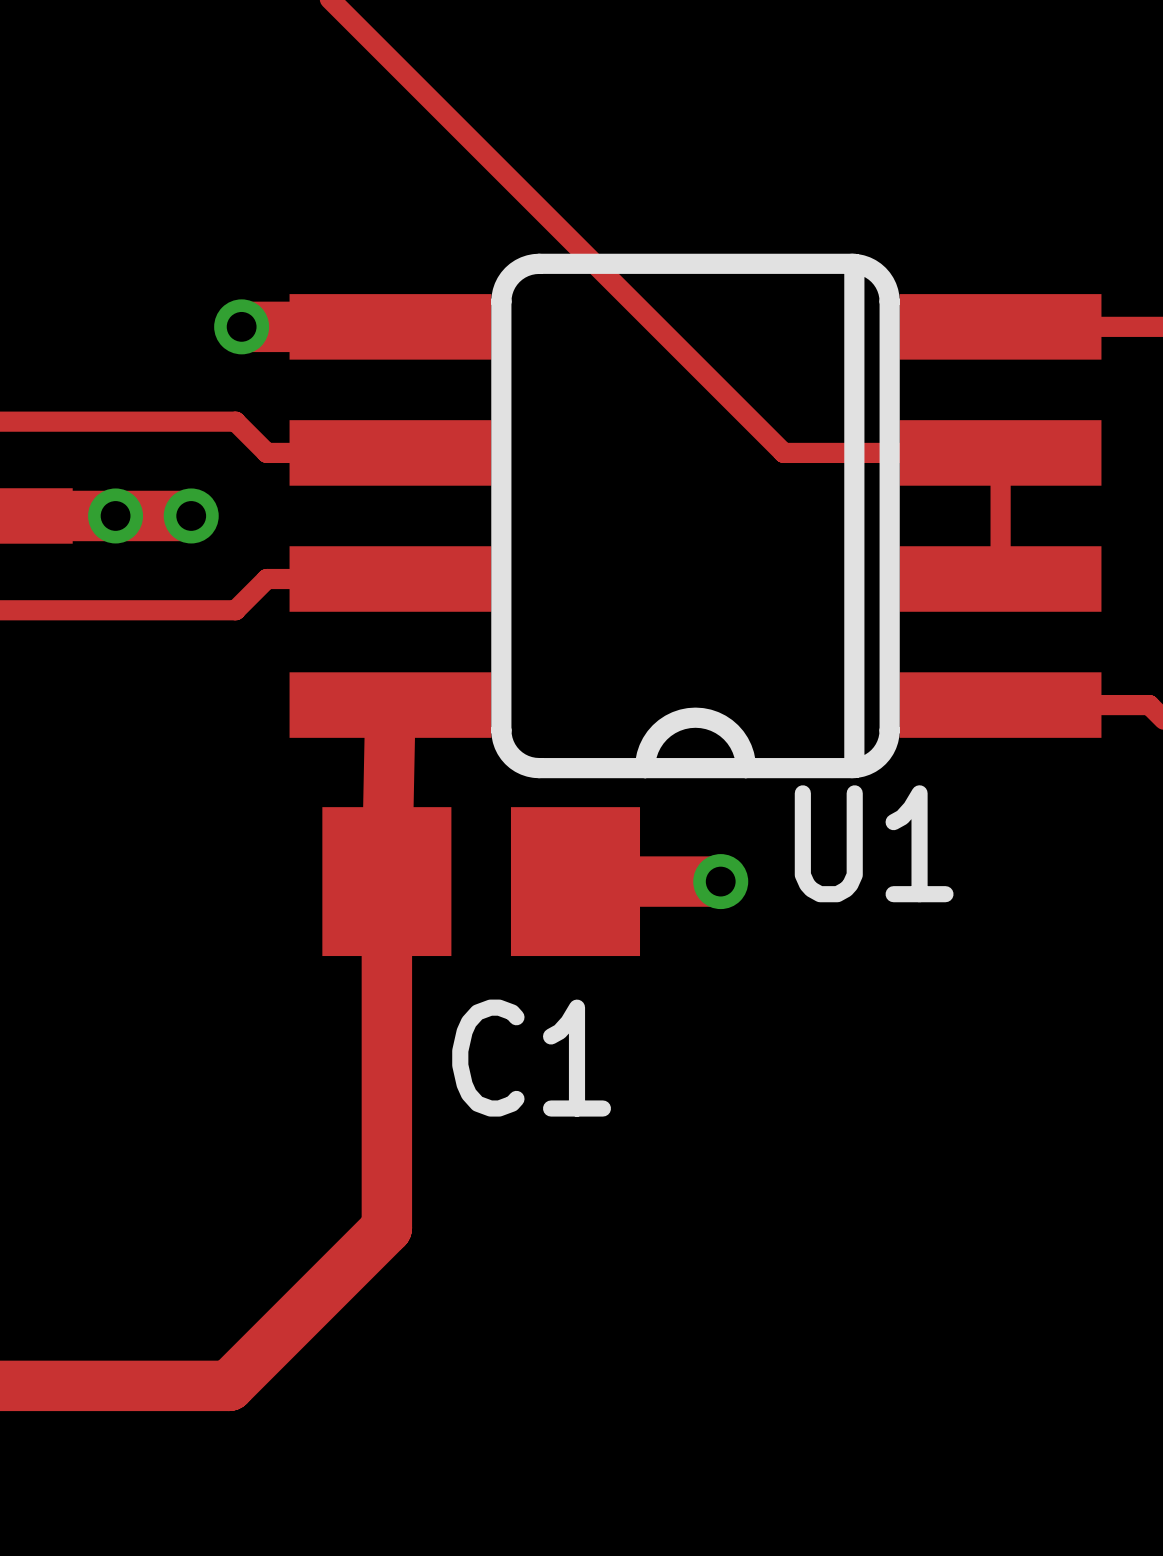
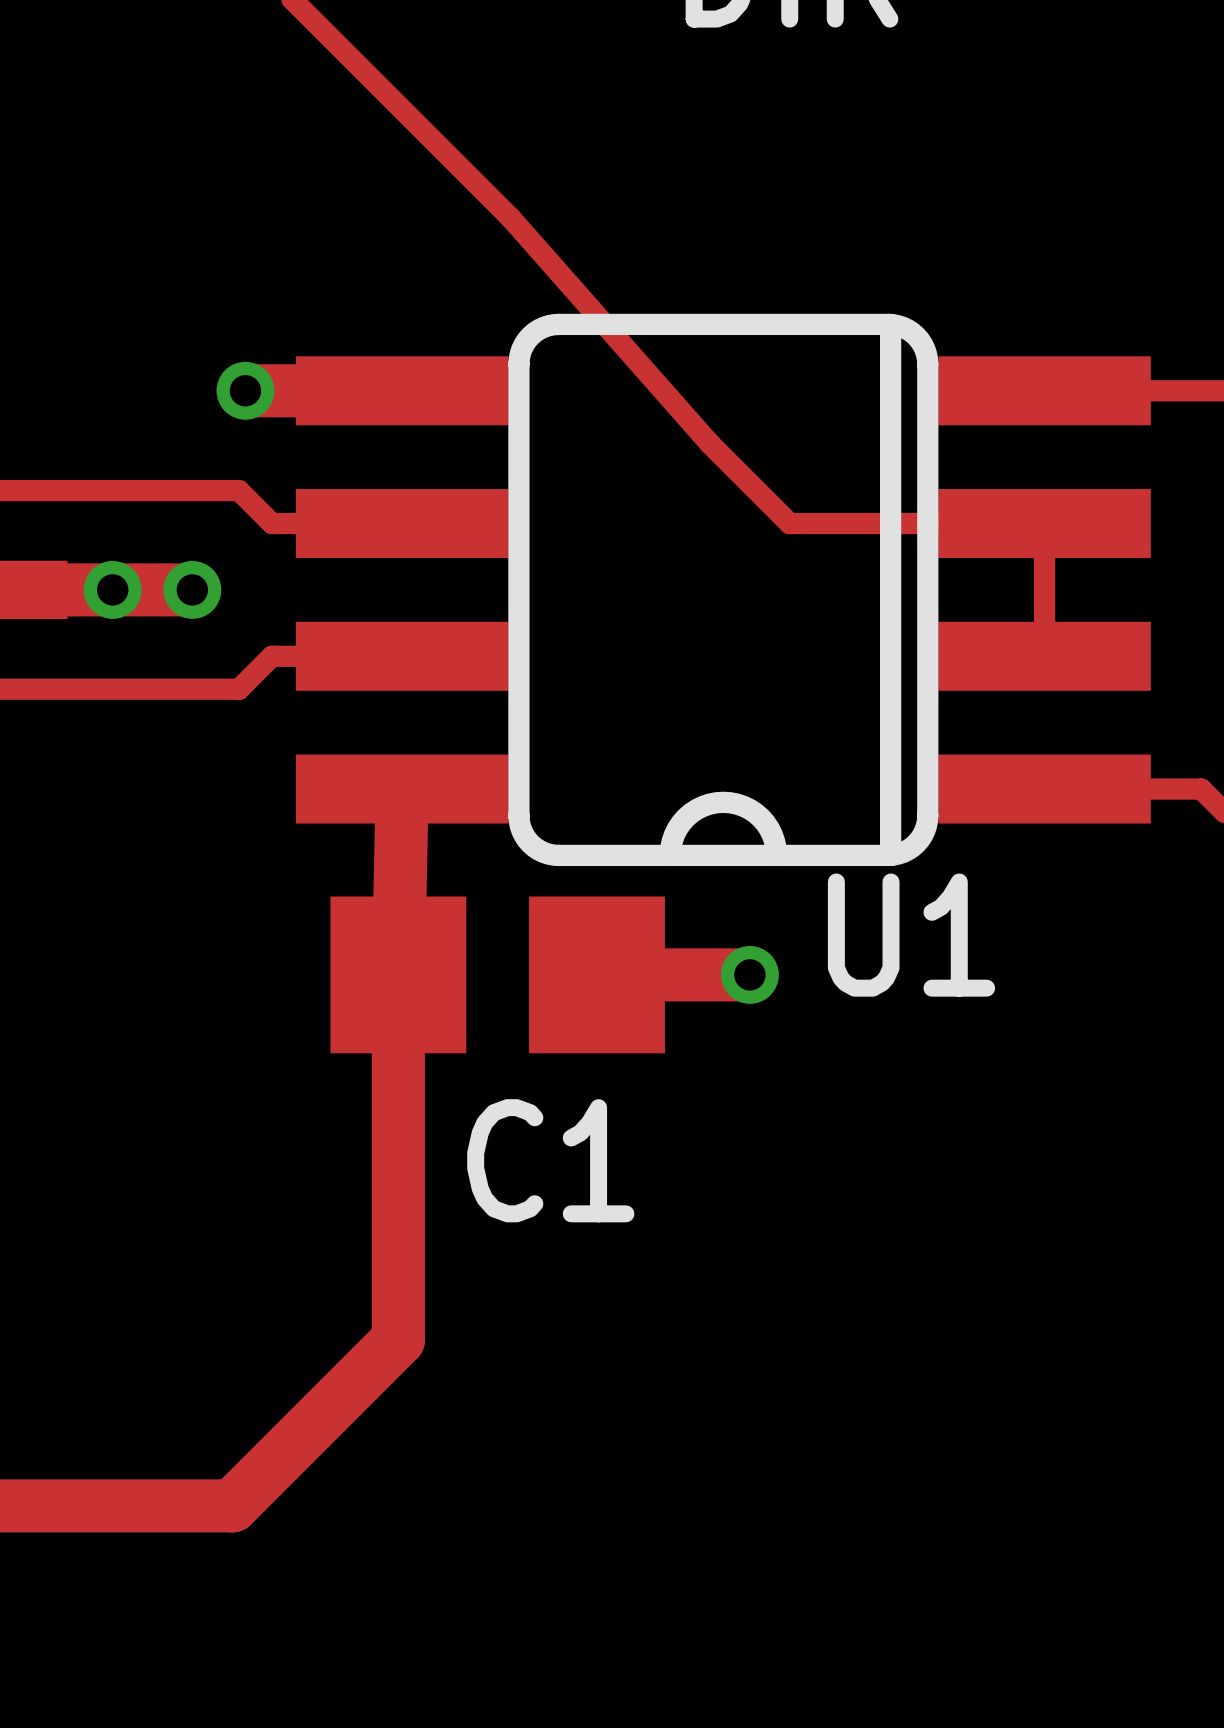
top track: (493, 162) (783, 452) -> (510, 218) (710, 443) (789, 523) (816, 523)

